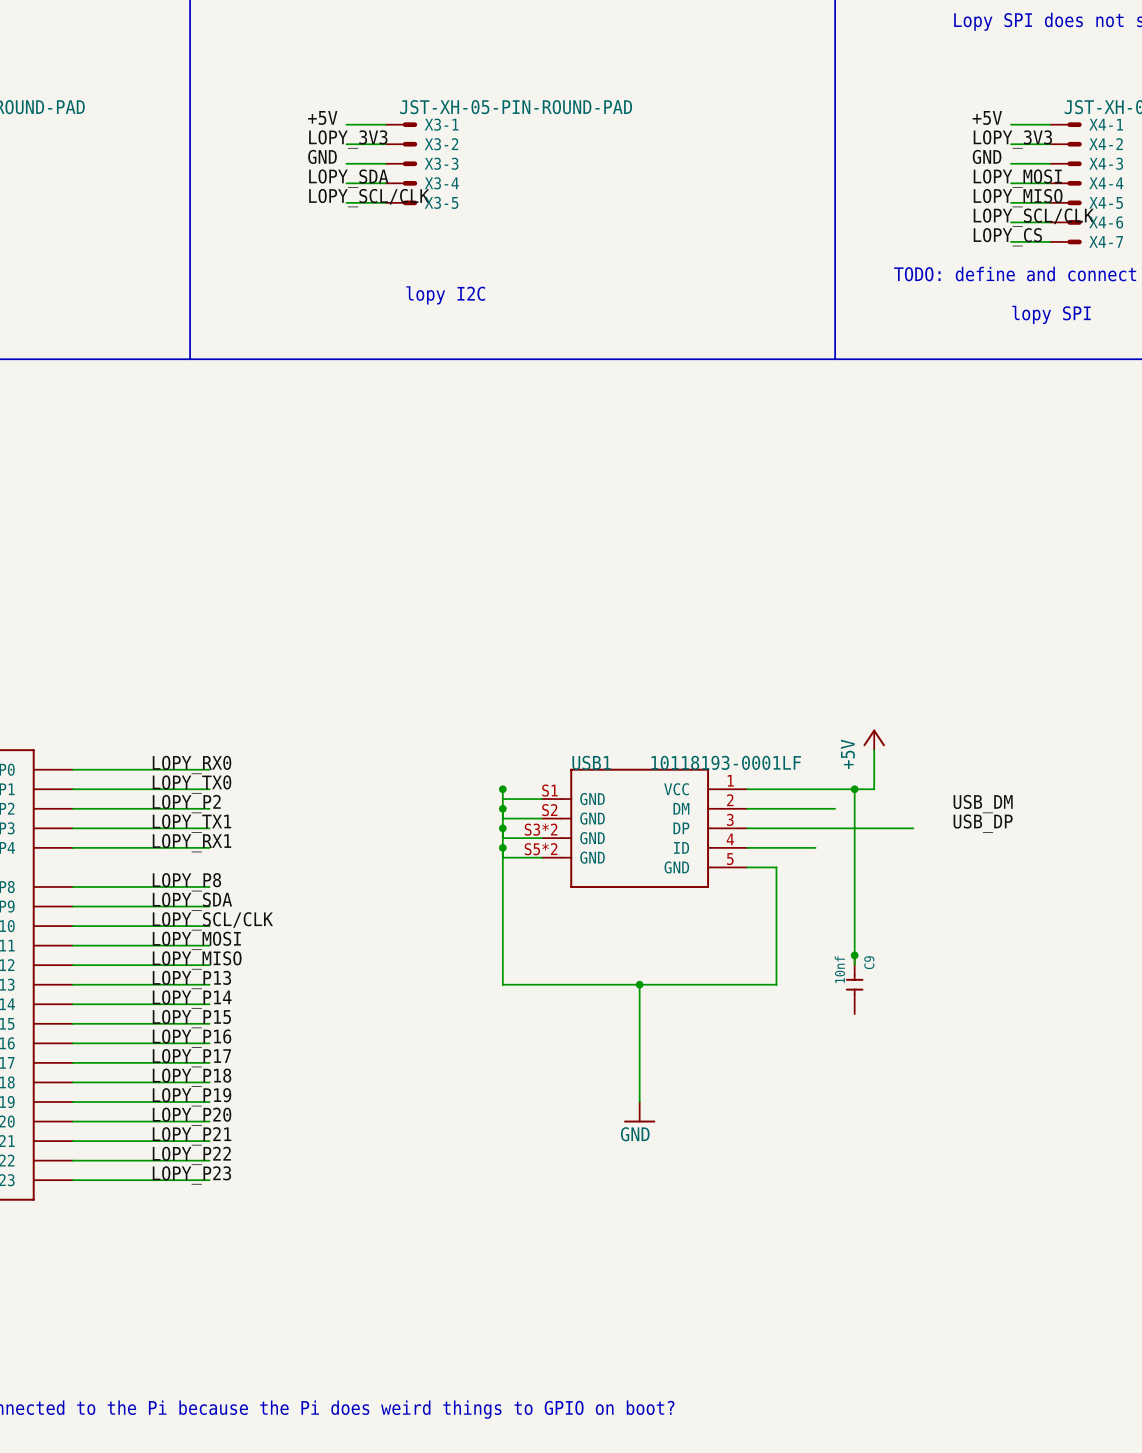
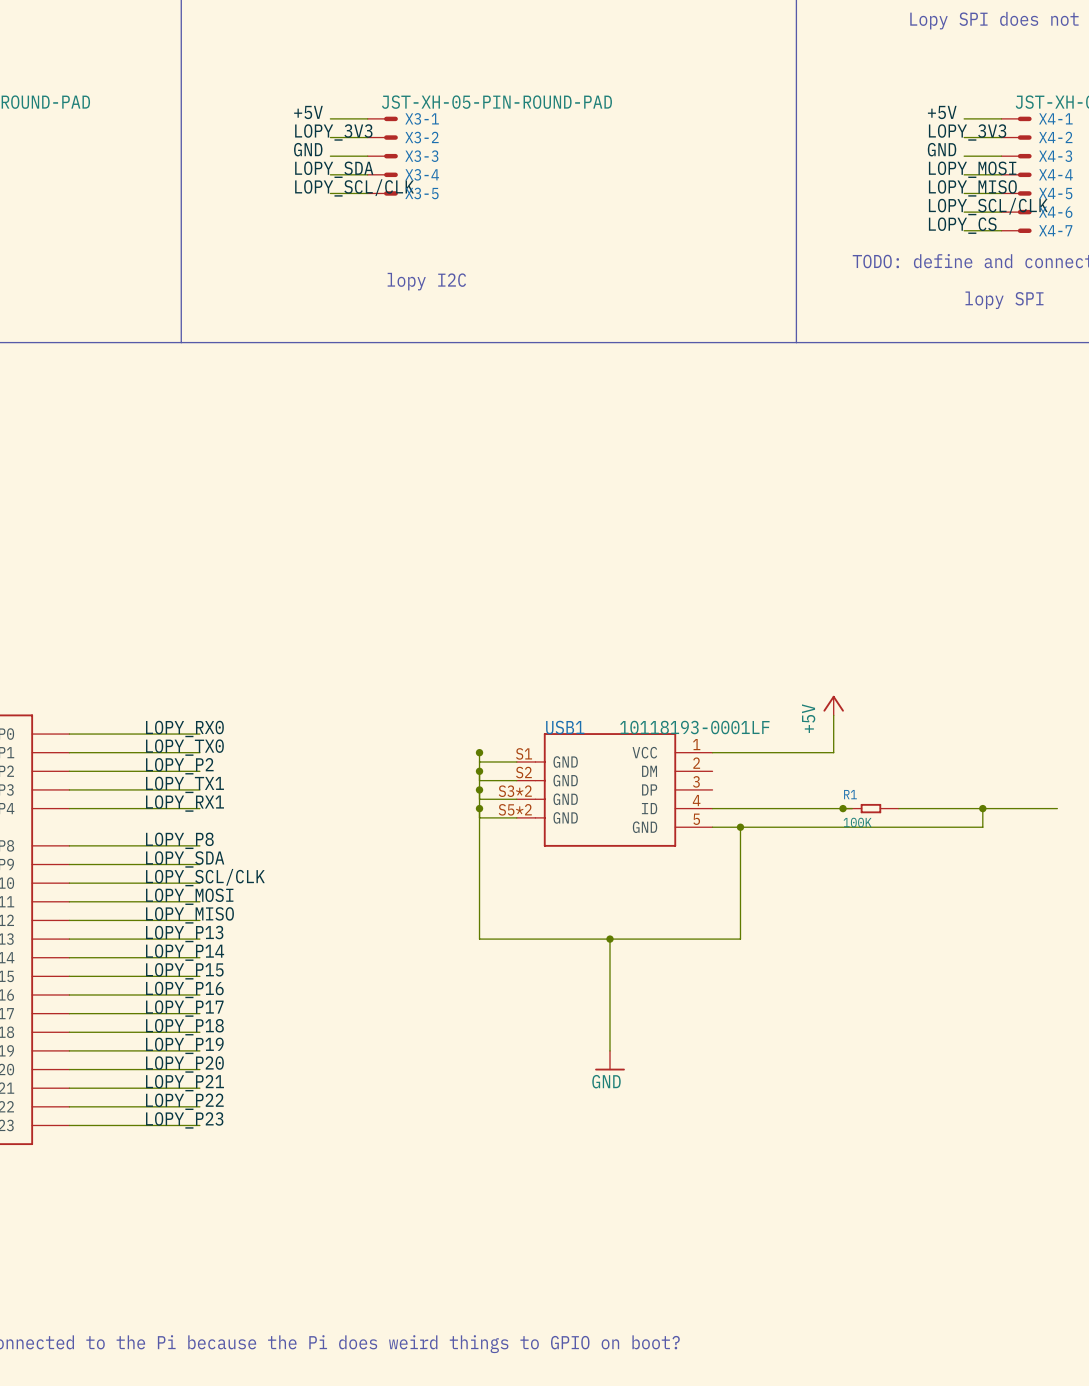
wire: (854, 789) (854, 965) -> none
junction: (854, 789) -> none
label: USB_DM (983, 804) -> none
wire: (747, 808) (835, 808) -> none
label: USB_DP (983, 823) -> none
wire: (747, 828) (913, 828) -> none
wire: none -> (777, 808) (852, 808)
junction: none -> (843, 808)
R1: none -> 100K (870, 808)
wire: none -> (898, 808) (1057, 808)
wire: none -> (982, 808) (982, 827) (740, 827)
junction: none -> (982, 808)
junction: none -> (740, 827)
junction: (854, 955) -> none
C9: 10nf (854, 984) -> none

